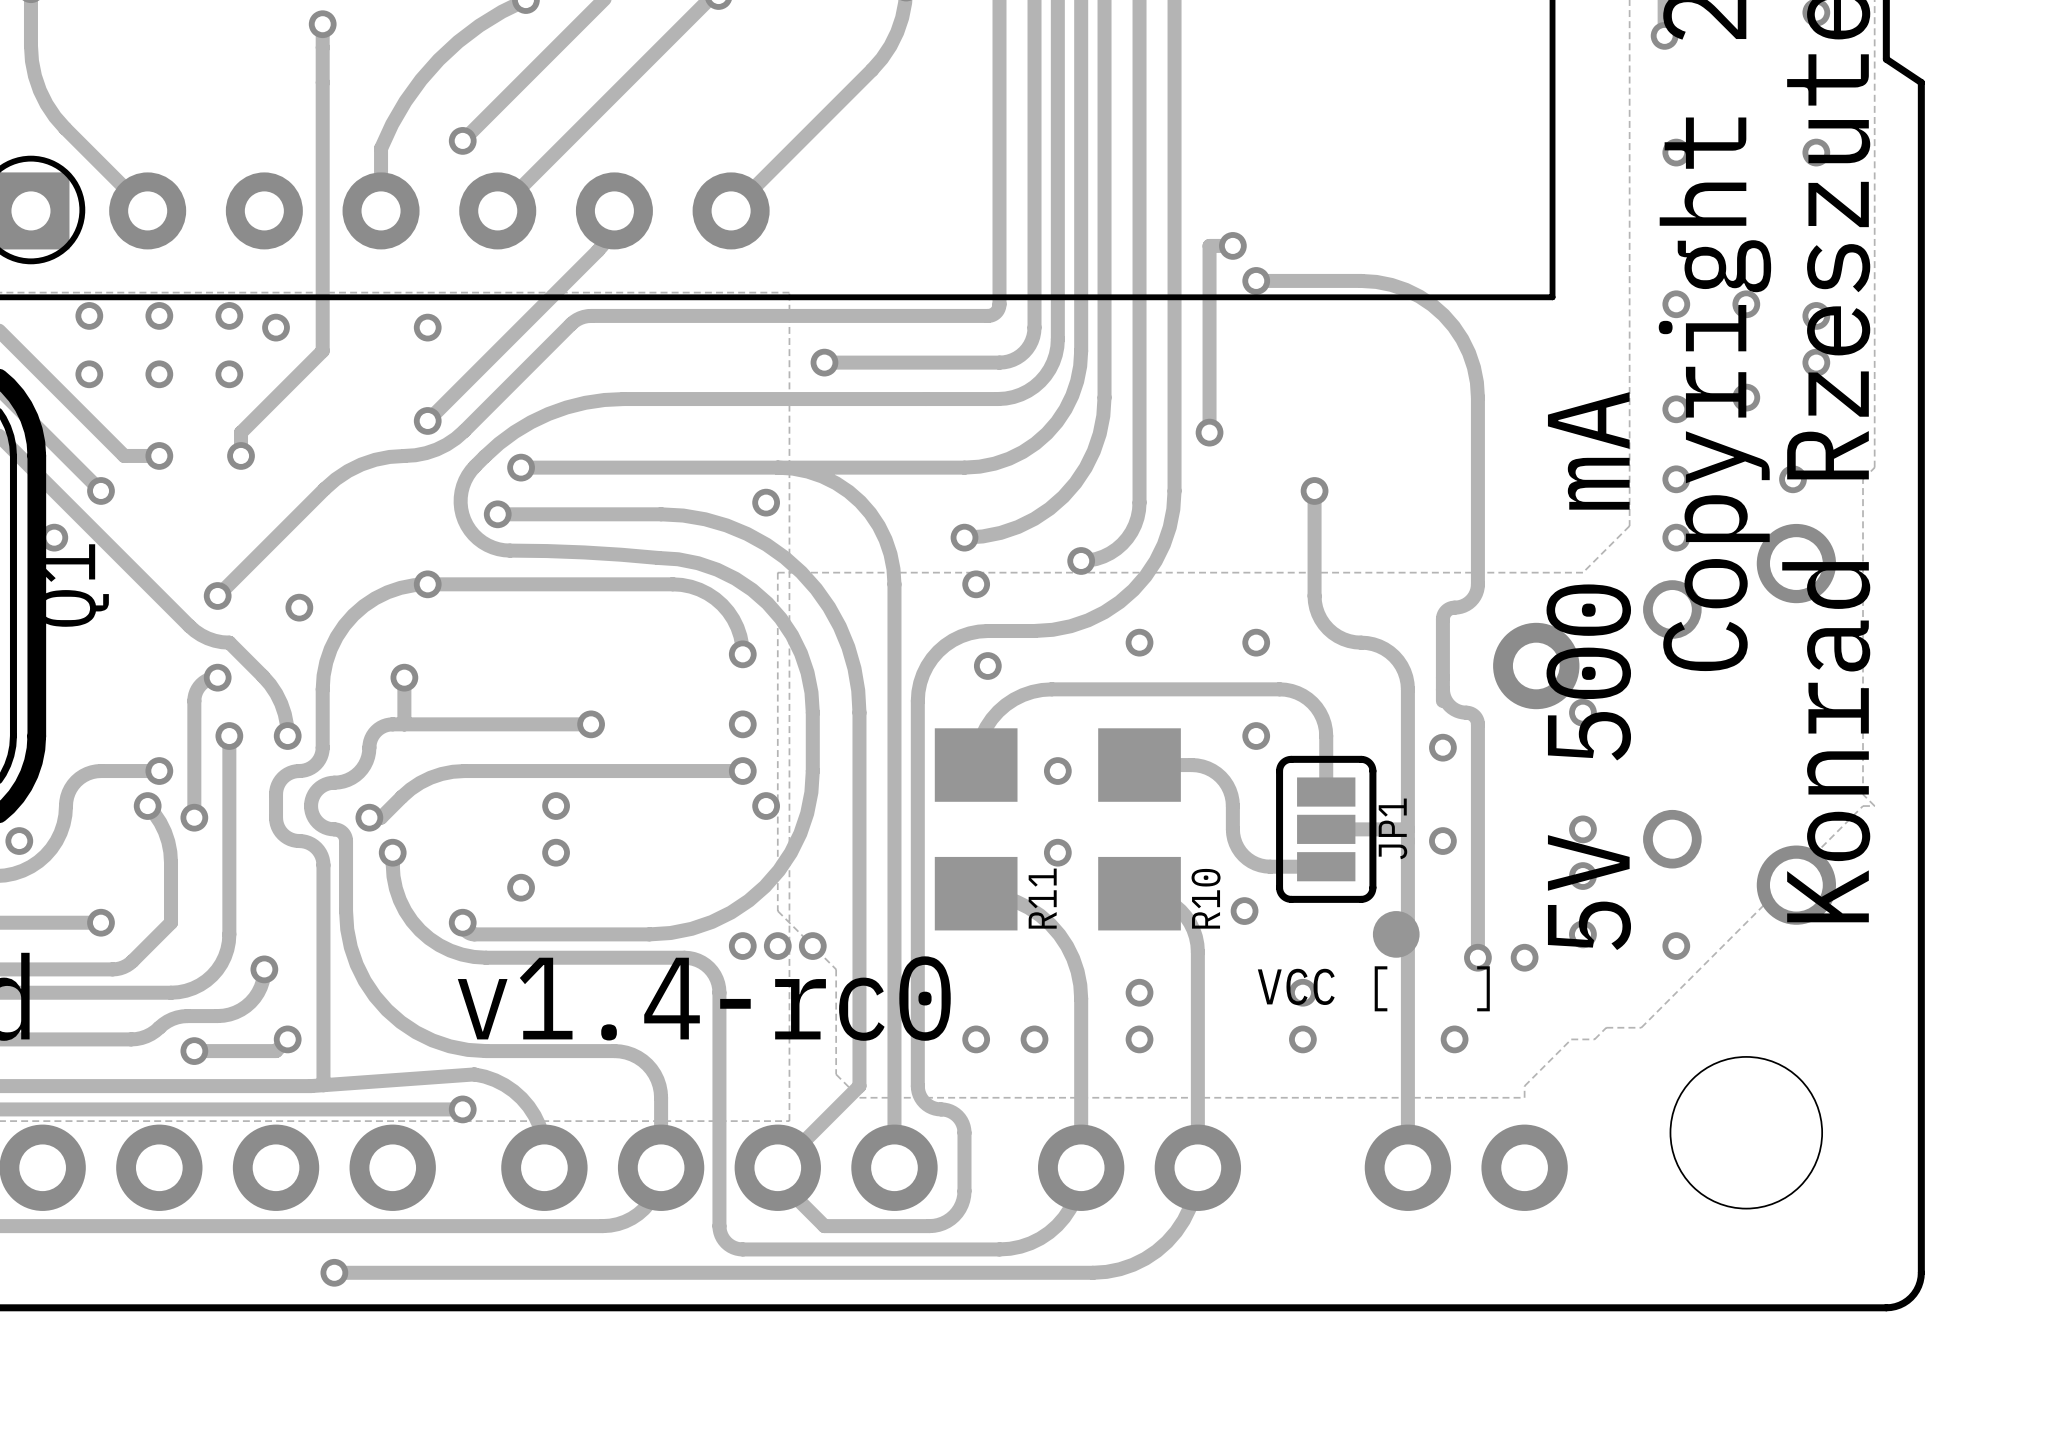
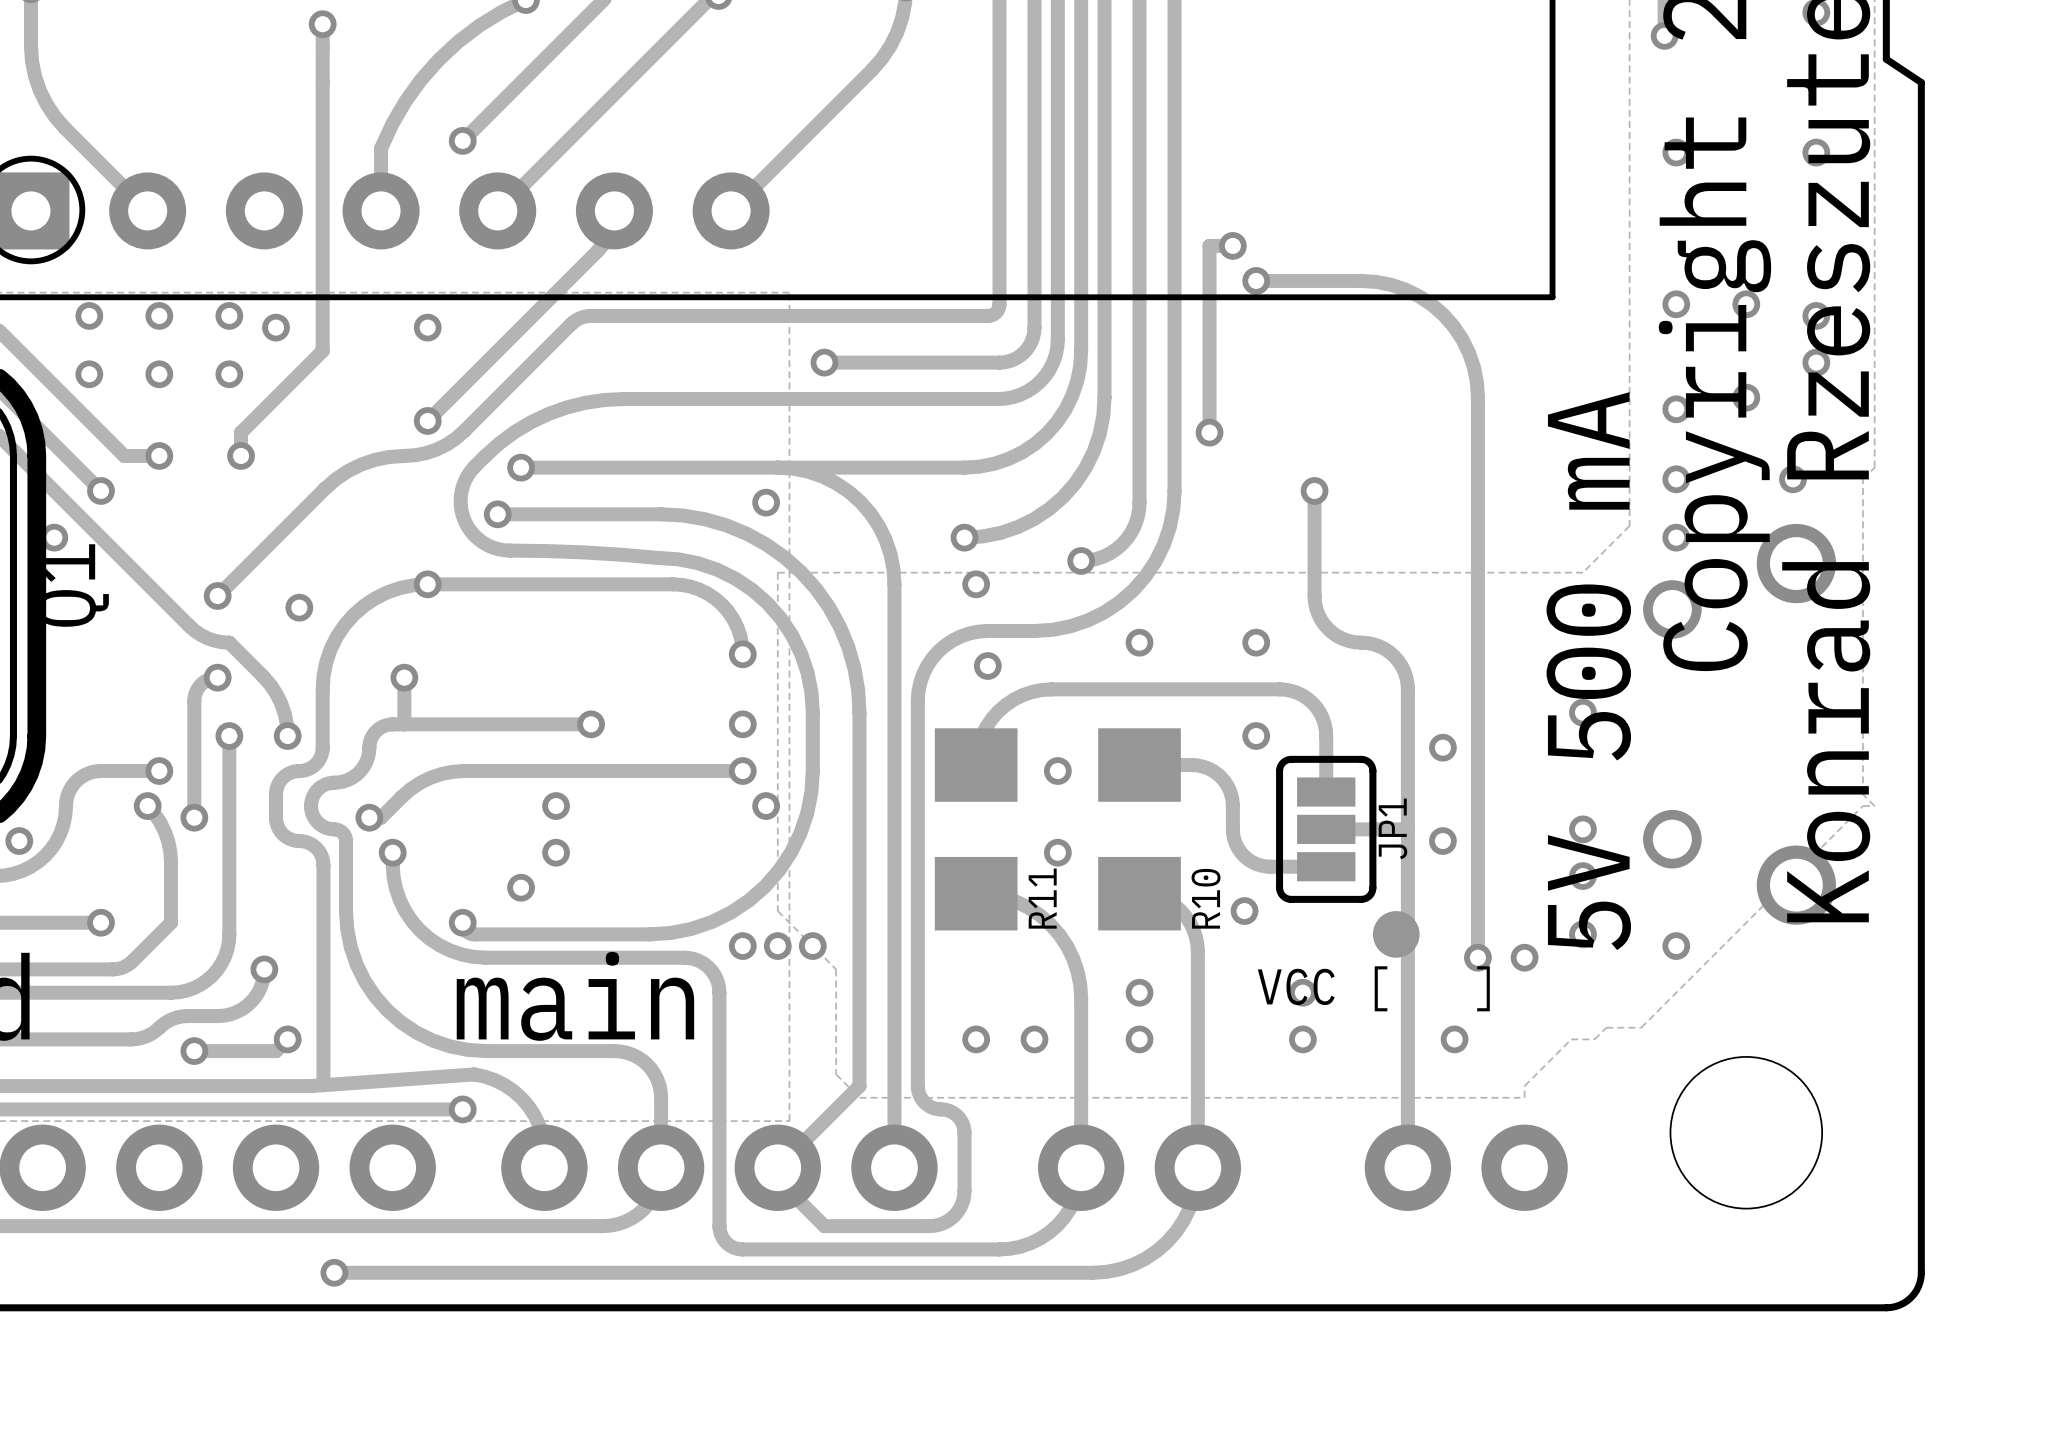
track: (1477, 584) (1476, 593) (1471, 600) (1463, 605) (1448, 609) (1443, 616) (1442, 701) -> (1477, 584) (1477, 724)
part: (1536, 666) -> none
track: (1442, 689) (1444, 698) (1449, 705) (1457, 710) (1472, 714) (1476, 718) (1477, 724) -> none
text: v1.4-rc0 (704, 998) -> main (575, 996)

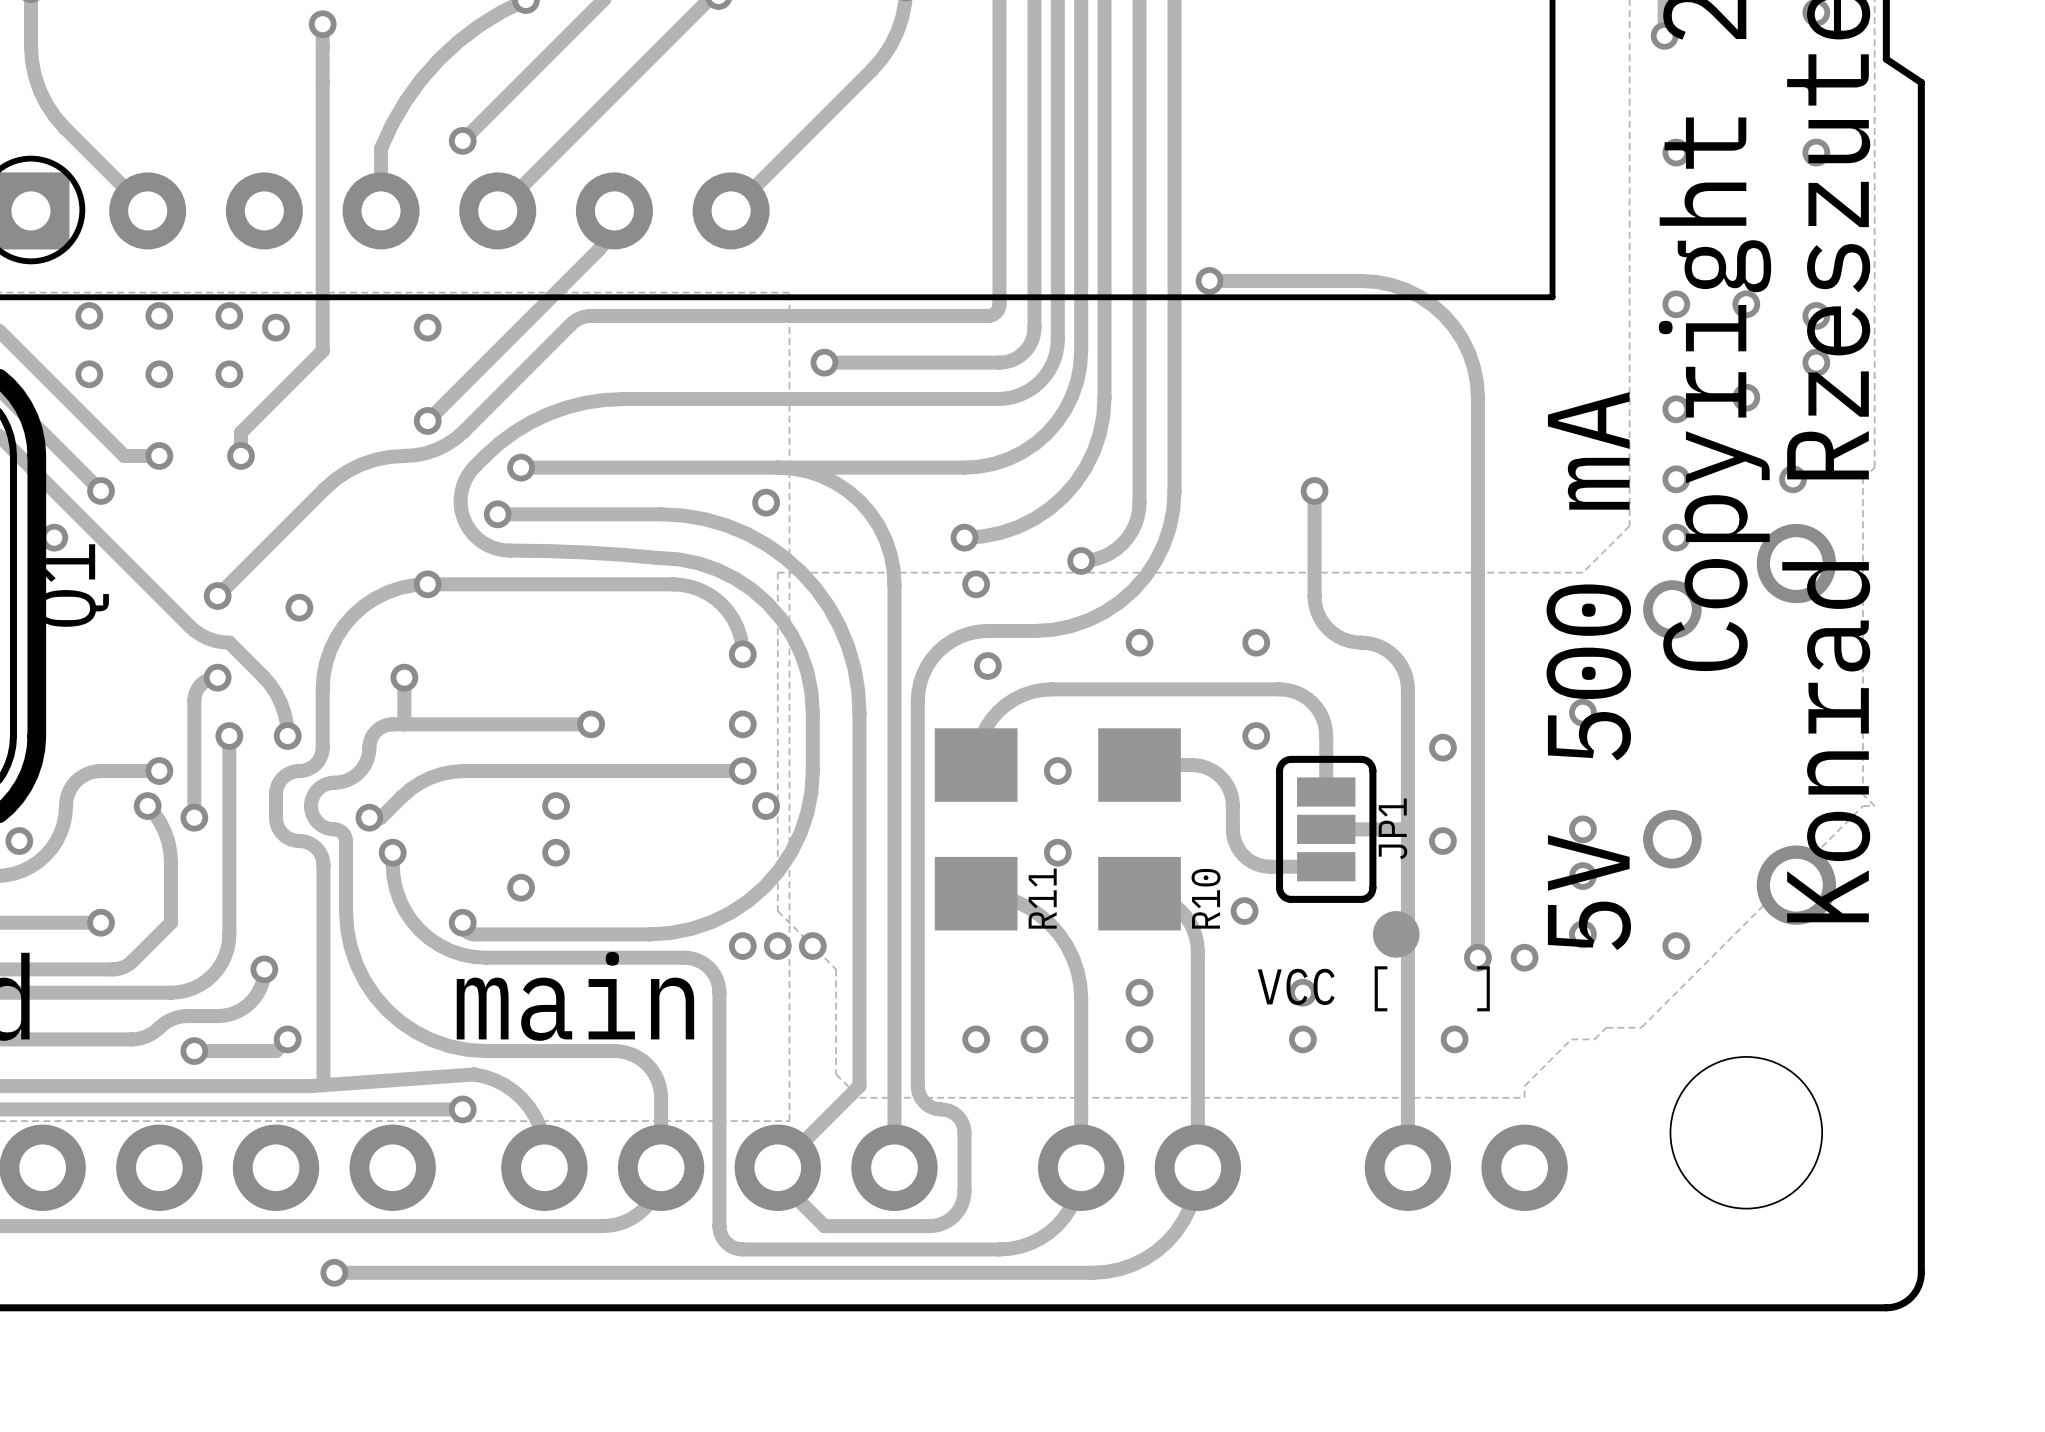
track: (1232, 245) (1209, 245) (1209, 432) -> none
via: (1232, 245) -> none
via: none -> (1209, 280)
track: none -> (1256, 280) (1209, 280)
via: (1256, 280) -> none
via: (1209, 432) -> none

